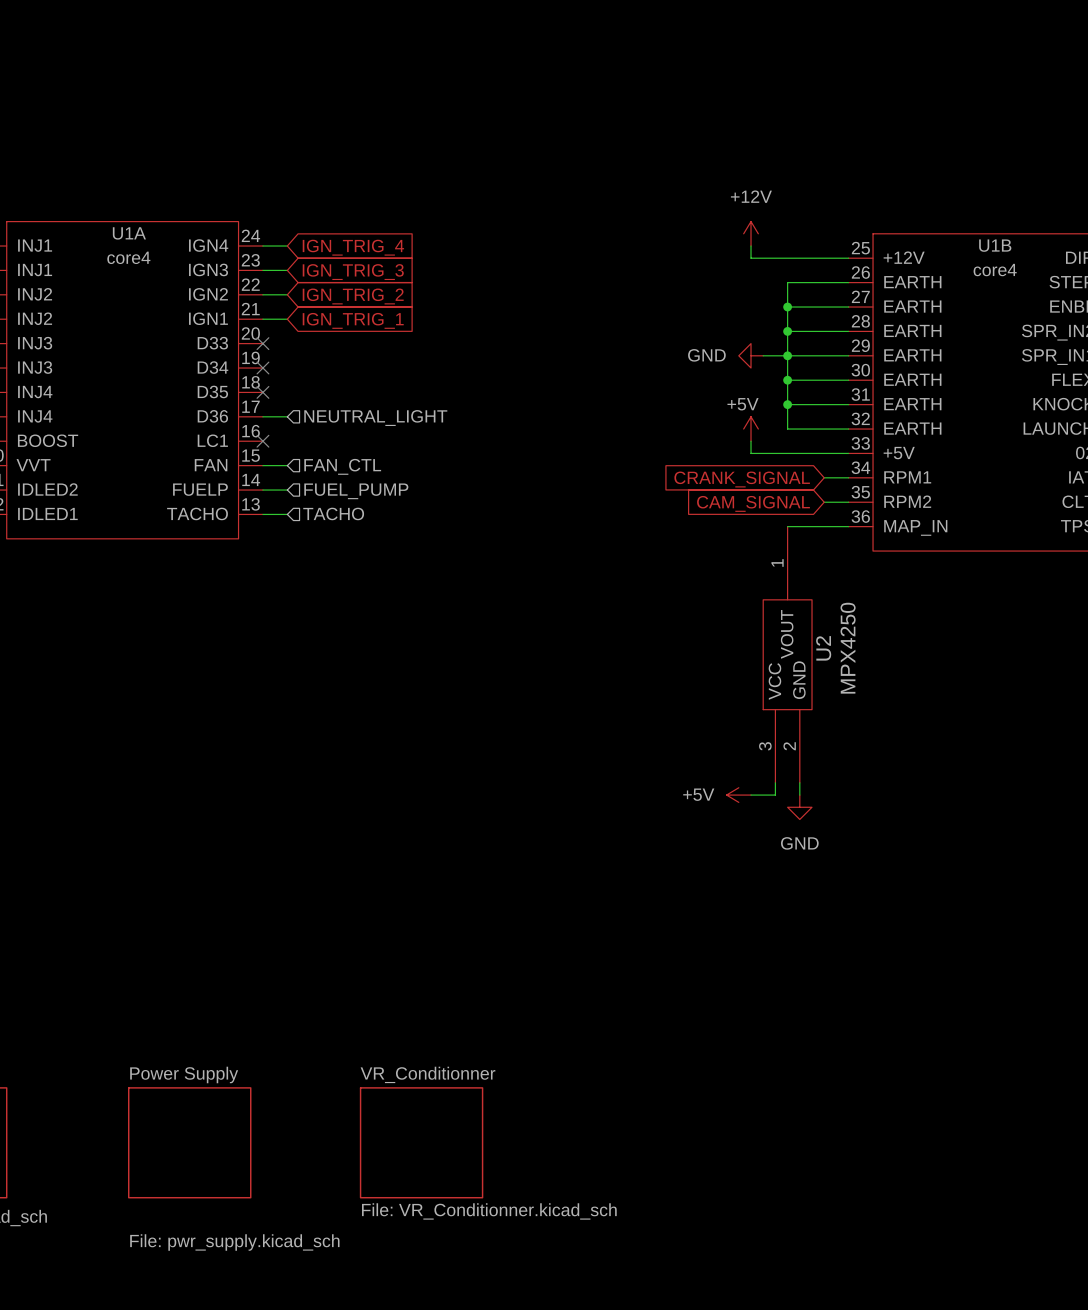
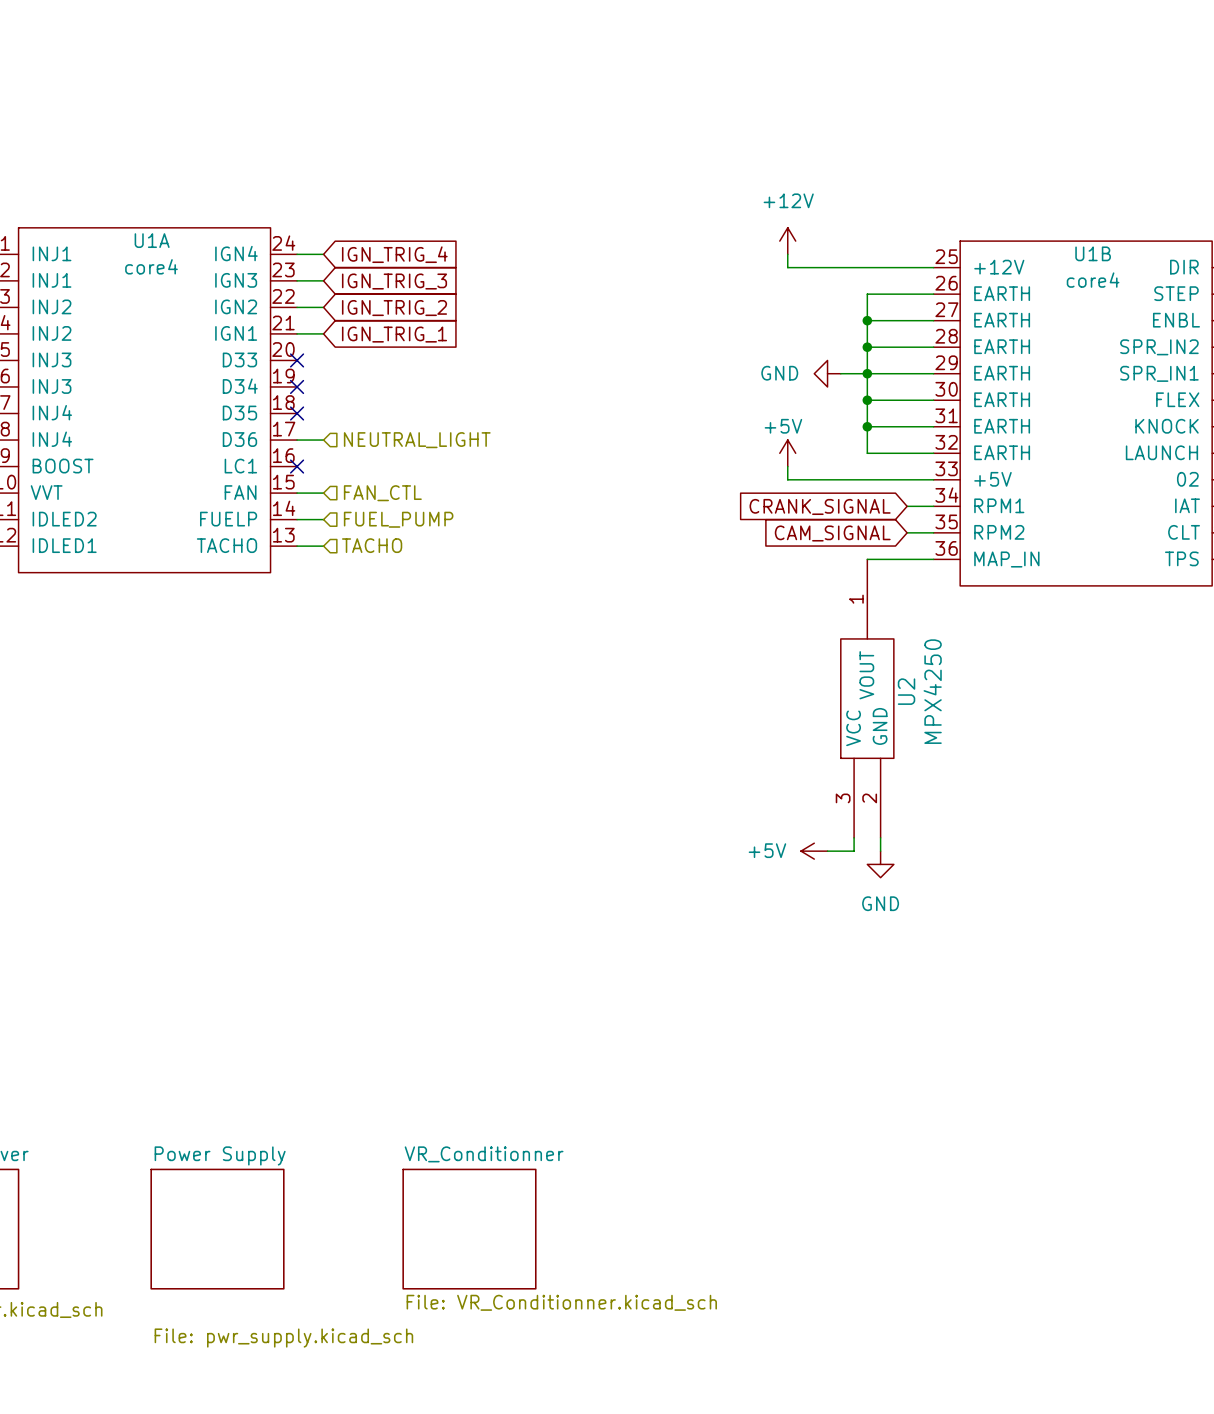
power symbol position: +12V (751, 233) -> +12V (787, 241)
wire: (751, 246) (751, 258) -> (787, 254) (787, 267) (827, 267)
power symbol position: +5V (751, 429) -> +5V (787, 453)
wire: (751, 441) (751, 453) -> (787, 466) (787, 479) (827, 479)

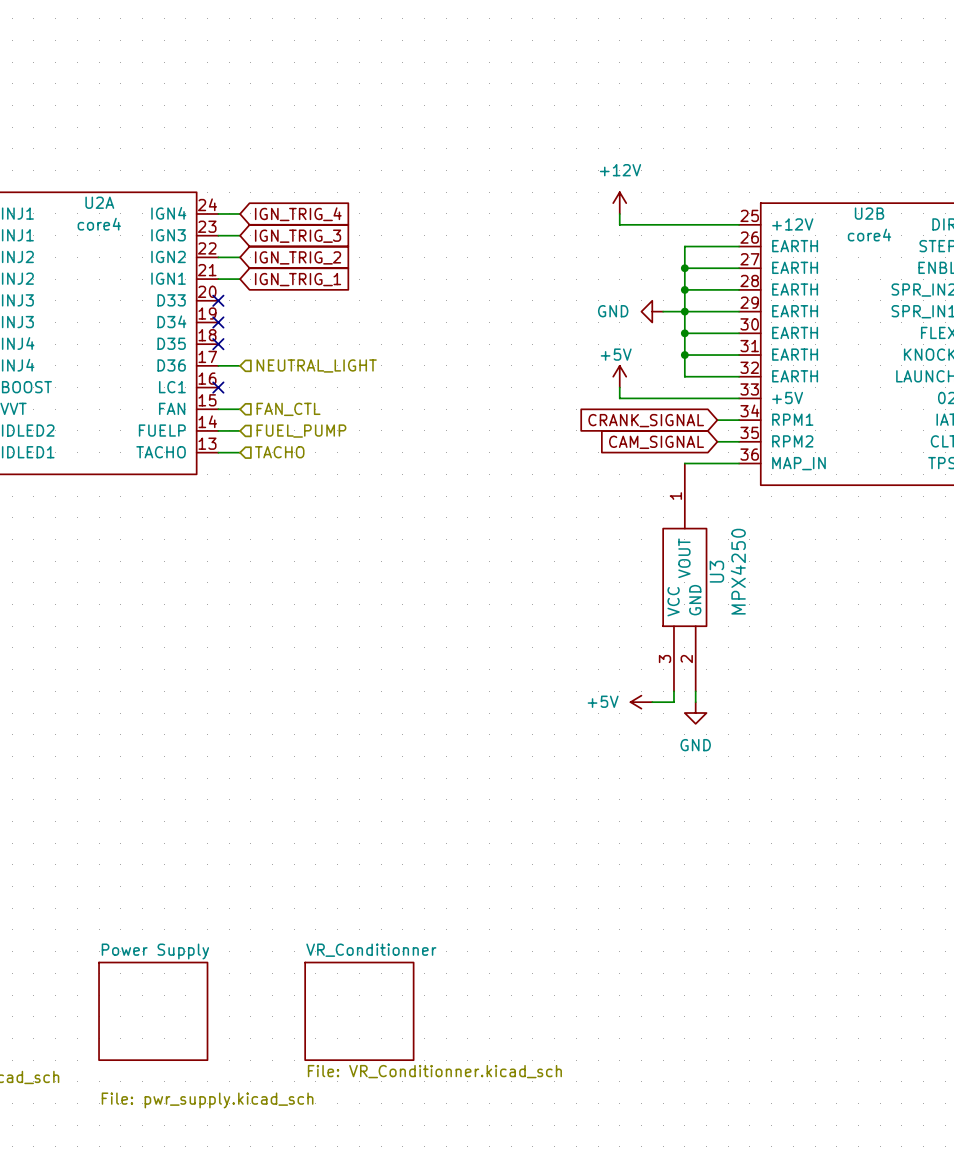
U1A name: U1A (152, 240) -> U2A (99, 202)
U1B name: U1B (1093, 253) -> U2B (869, 213)
U2 name: U2 (906, 691) -> U3 (716, 571)

